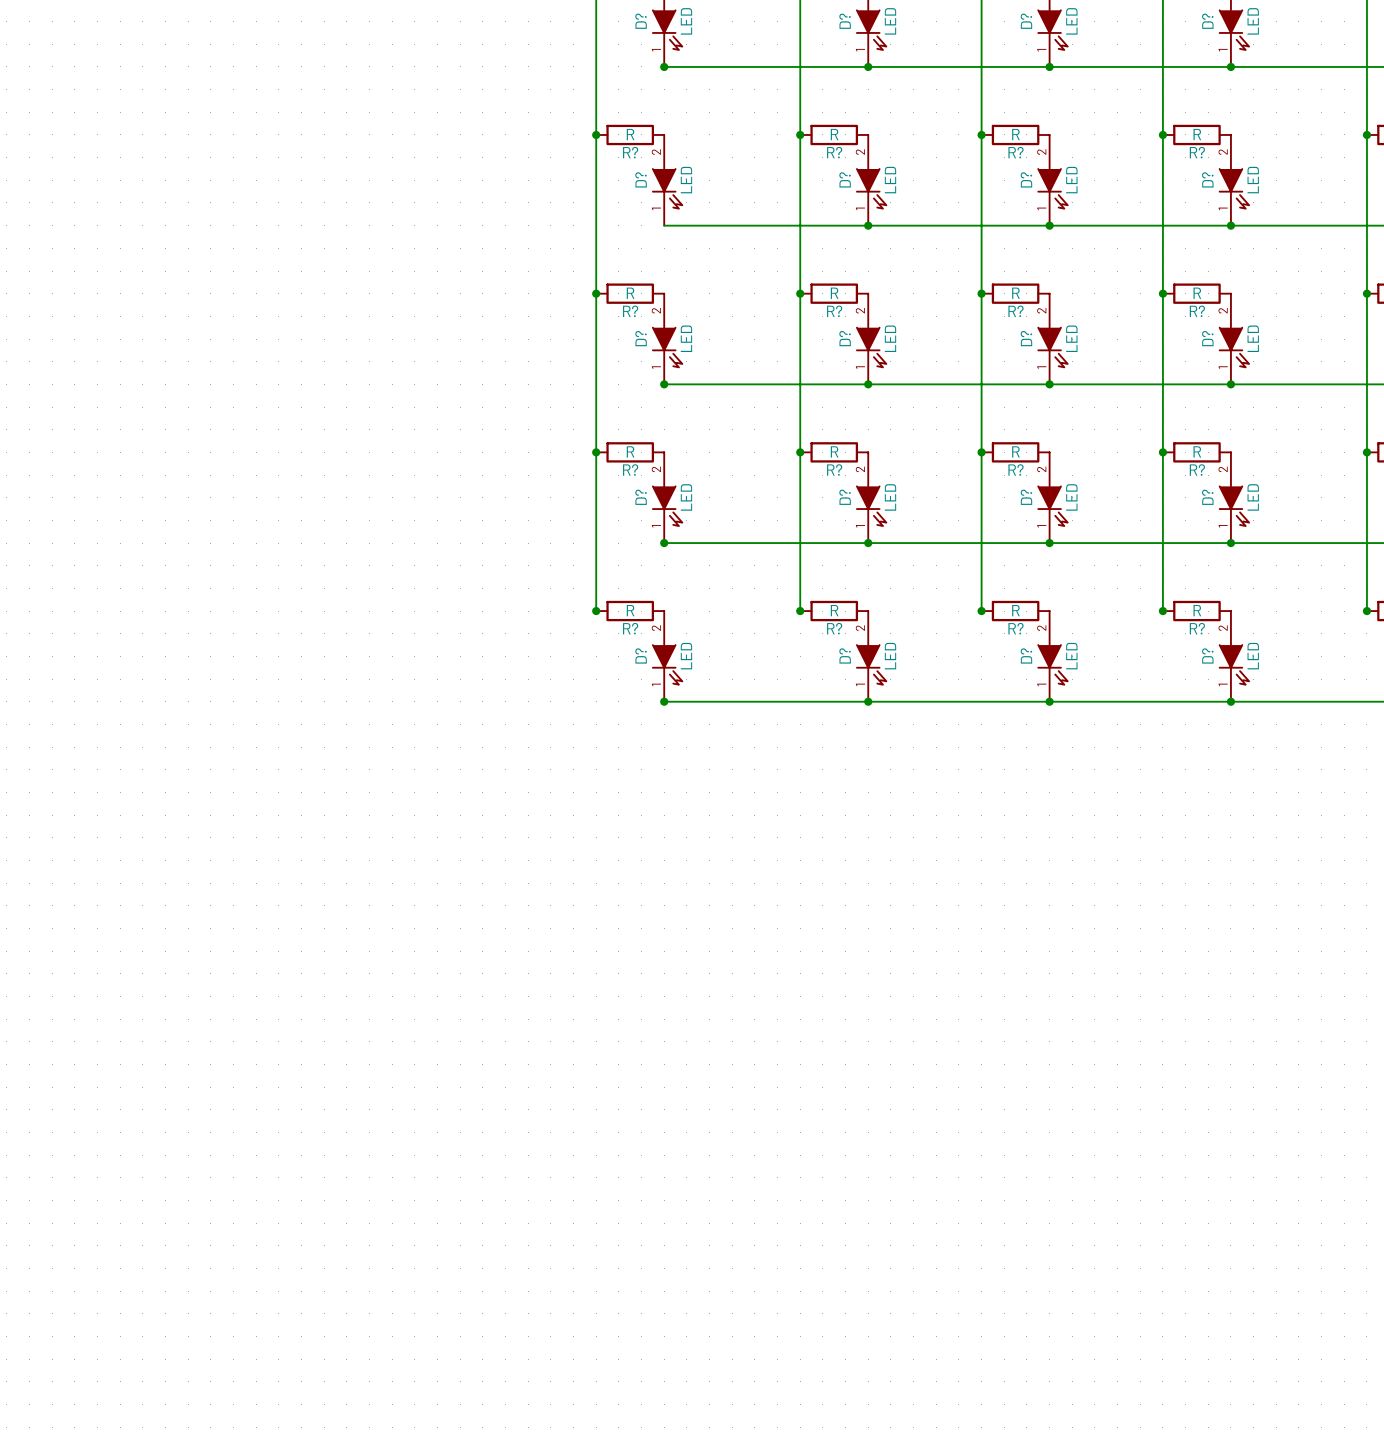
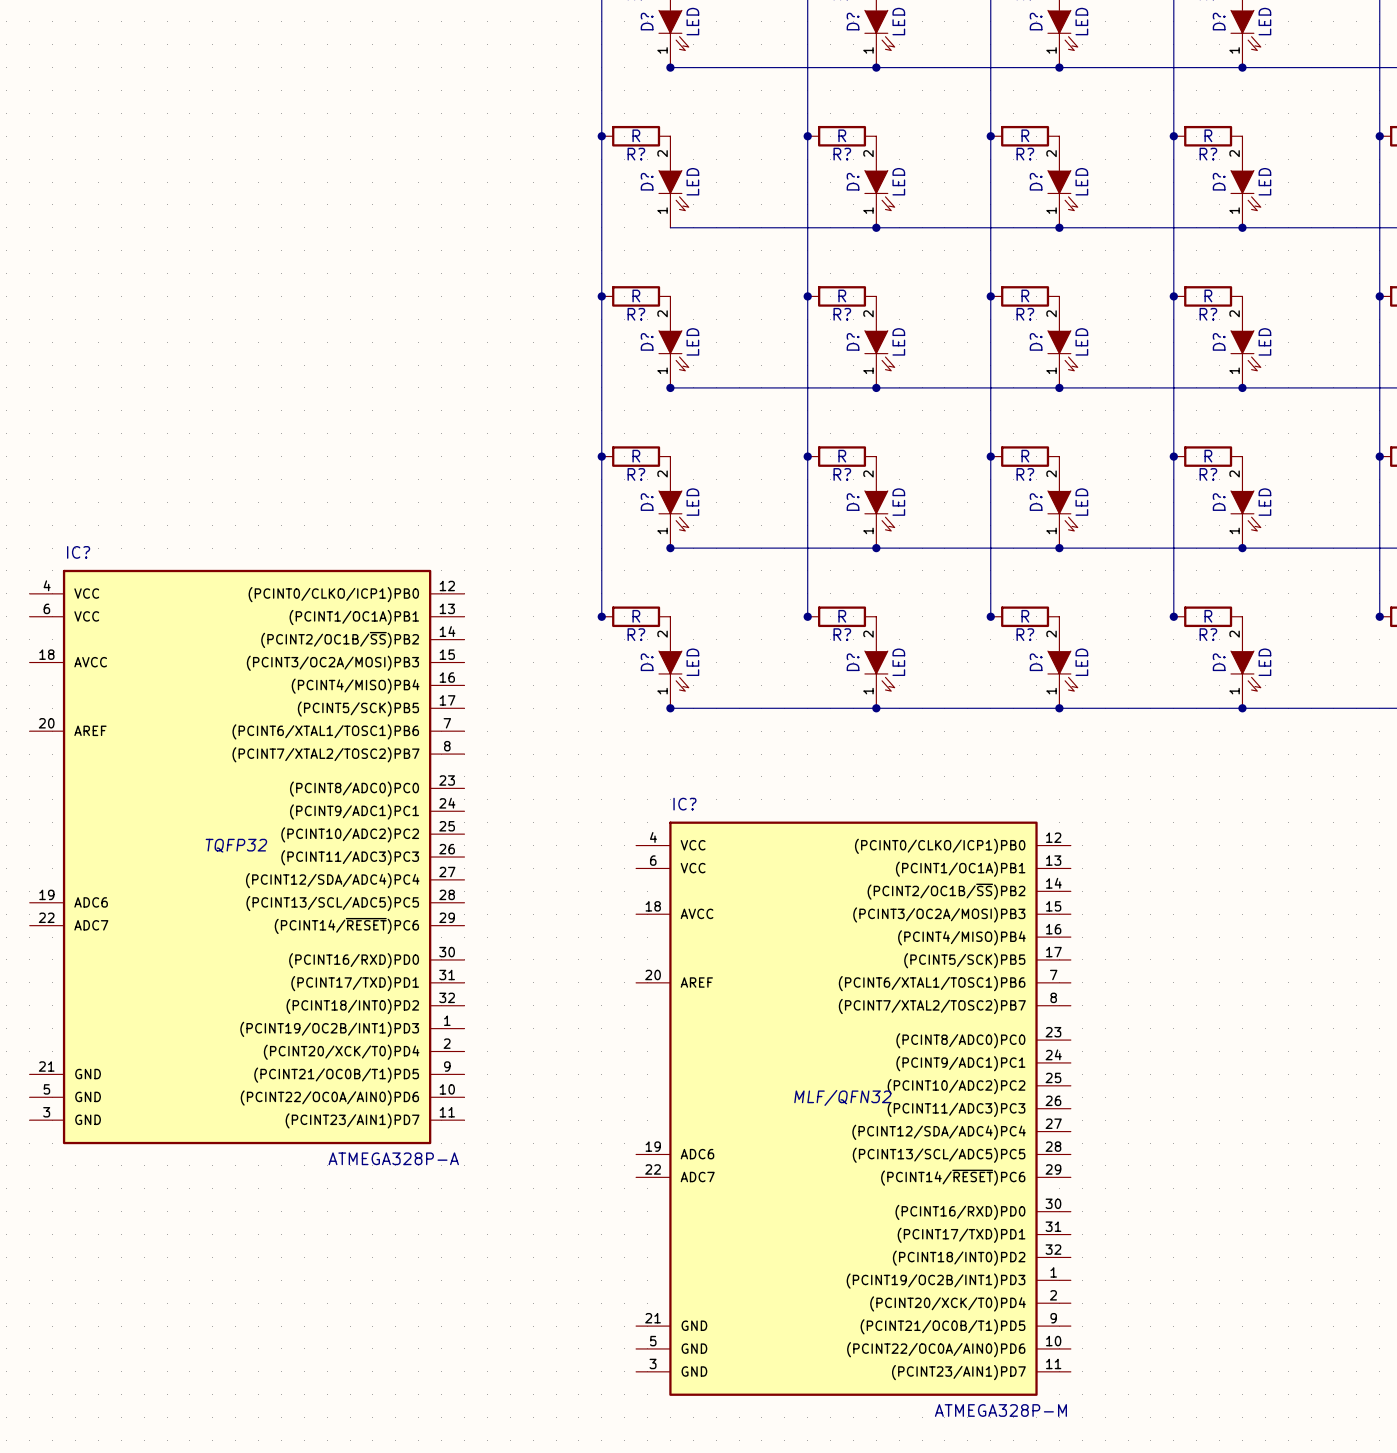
IC?: none -> ATMEGA328P-A (247, 857)
IC?: none -> ATMEGA328P-M (853, 1108)

